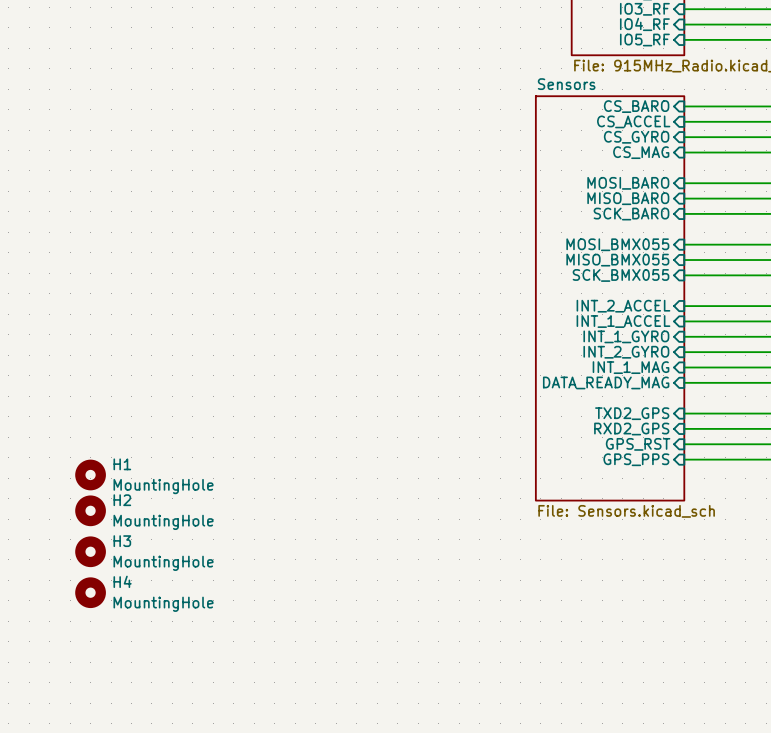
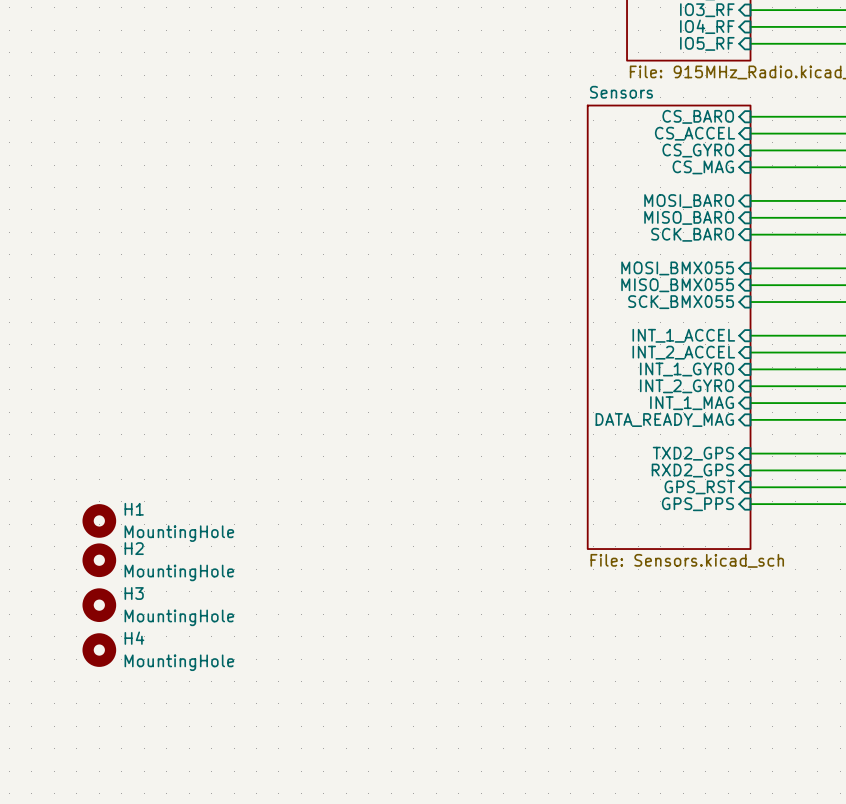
sheet pin: INT_2_ACCEL (623, 306) -> INT_1_ACCEL (683, 335)
sheet pin: INT_1_ACCEL (623, 321) -> INT_2_ACCEL (683, 352)

